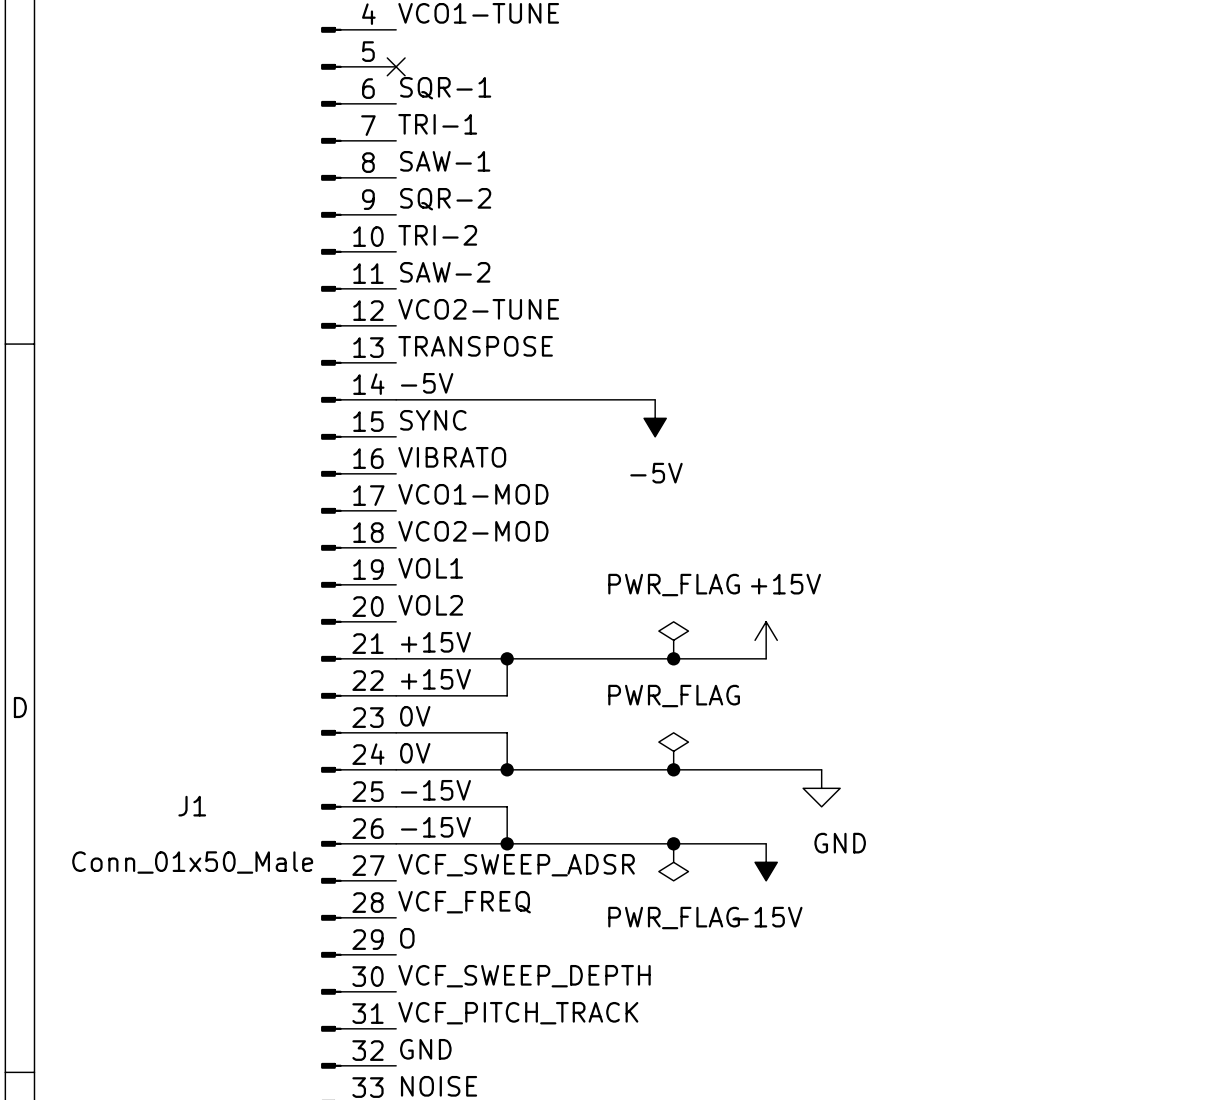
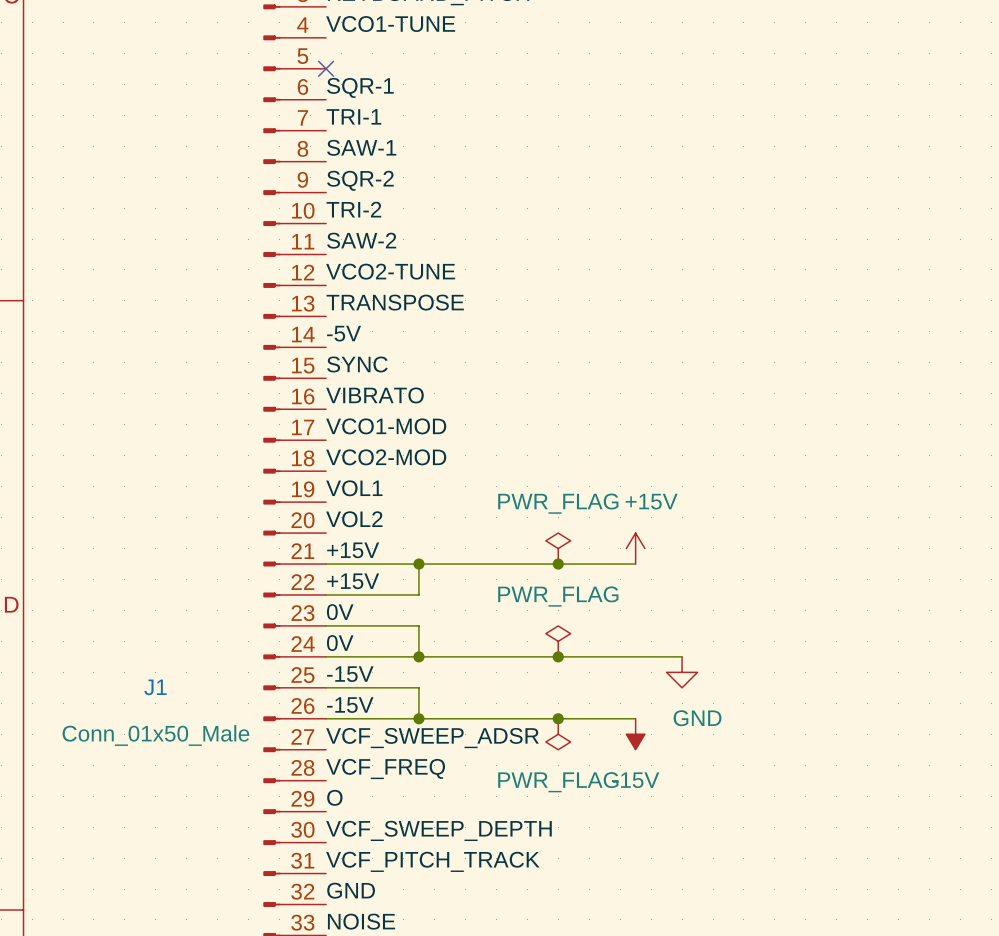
wire: (396, 399) (655, 399) -> none
power symbol: -5V (655, 418) -> none

